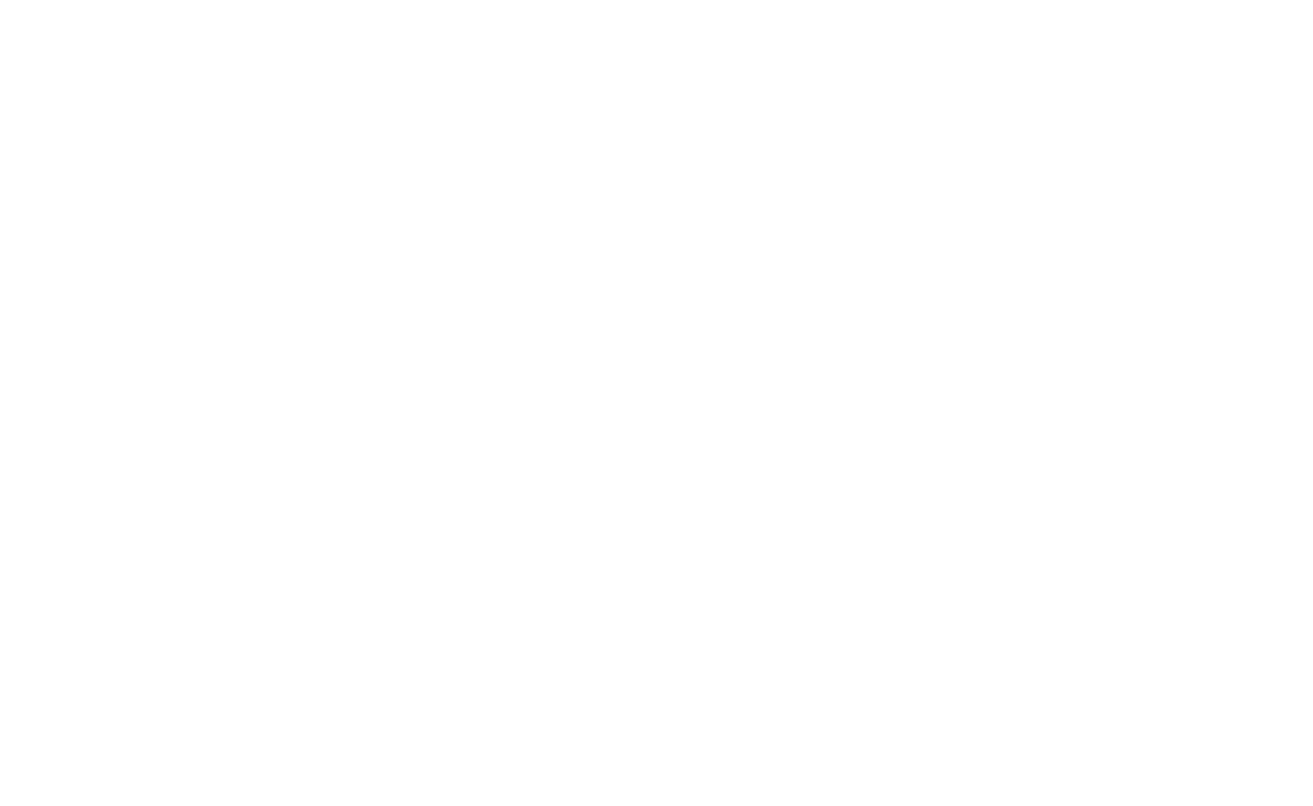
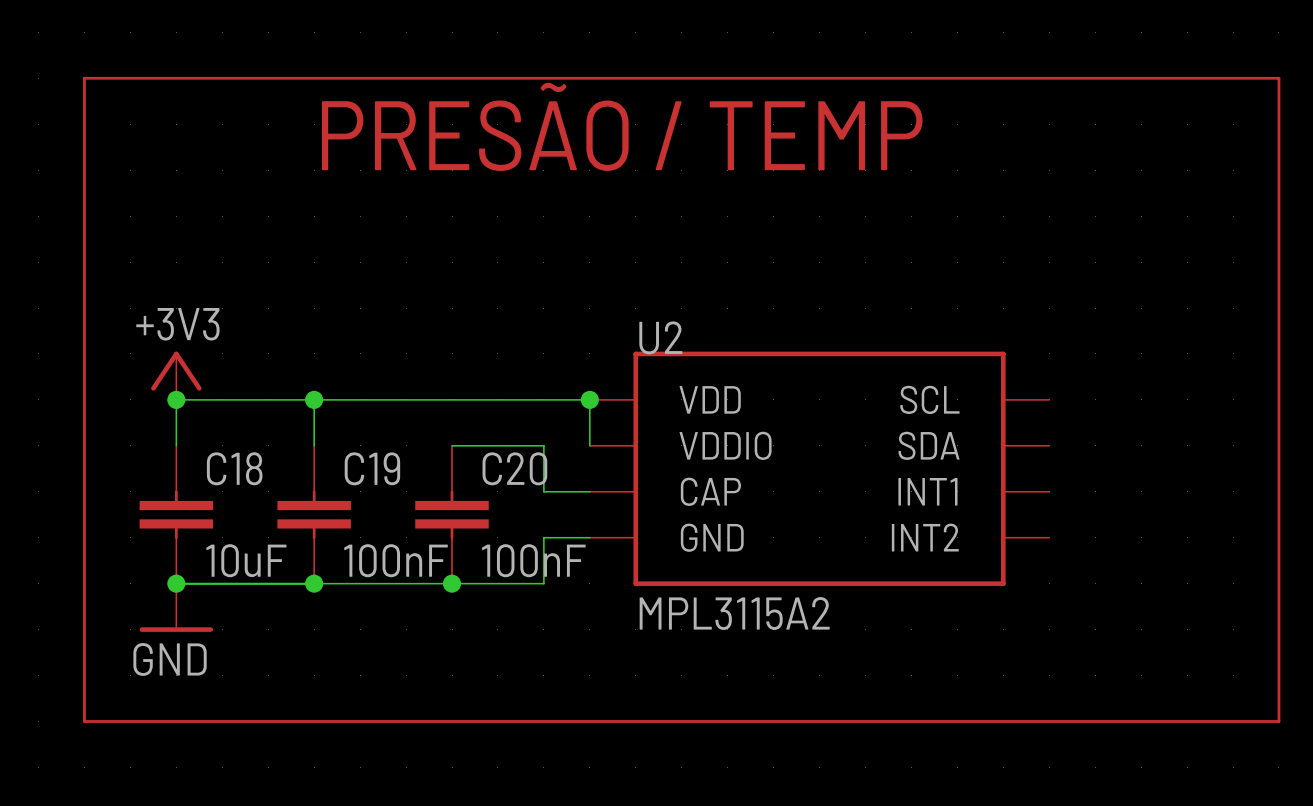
line: none -> (84, 78) (84, 721) (1278, 721) (1278, 78) (84, 78)
text: none -> PRESÃO / TEMP (622, 126)
power symbol: none -> +3V3 (176, 375)
junction: none -> (176, 399)
wire: none -> (314, 399) (314, 445)
junction: none -> (314, 399)
junction: none -> (589, 399)
wire: none -> (176, 445) (176, 399) (589, 399) (589, 445)
wire: none -> (452, 445) (543, 445) (543, 491) (589, 491)
U2: none -> MPL3115A2 (819, 468)
C18: none -> 10uF (176, 514)
C19: none -> 100nF (314, 514)
C20: none -> 100nF (452, 514)
wire: none -> (589, 537) (543, 537) (543, 583) (176, 583)
junction: none -> (176, 583)
junction: none -> (314, 583)
junction: none -> (452, 583)
power symbol: none -> GND (176, 607)

